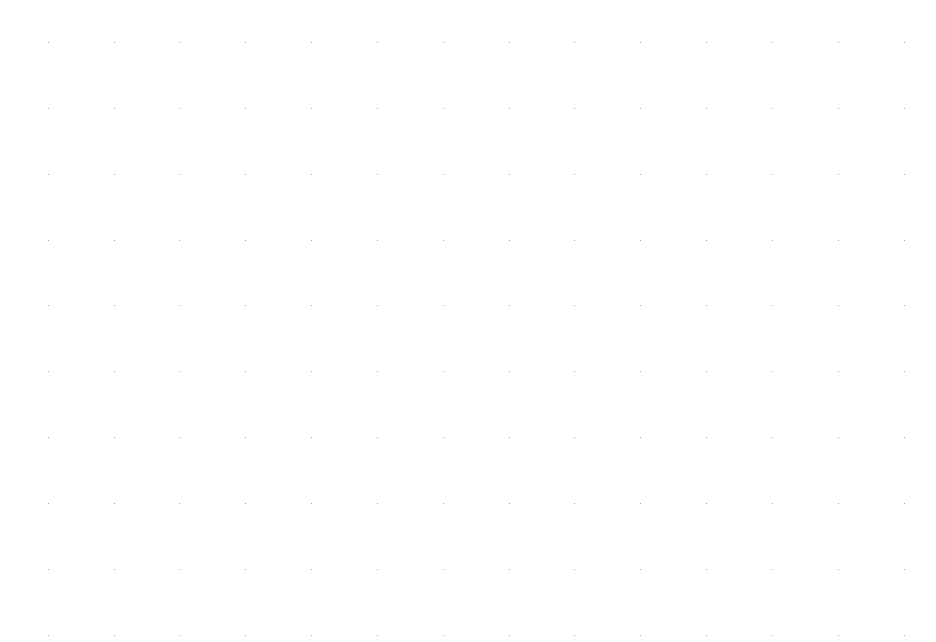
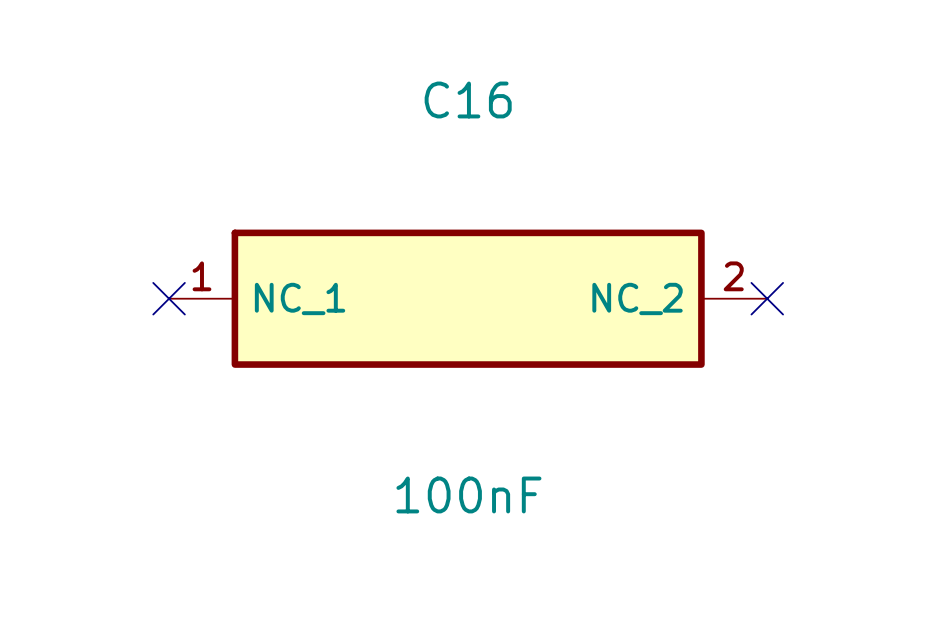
no-connect mark: none -> (169, 298)
C16: none -> 100nF (468, 298)
no-connect mark: none -> (767, 298)

